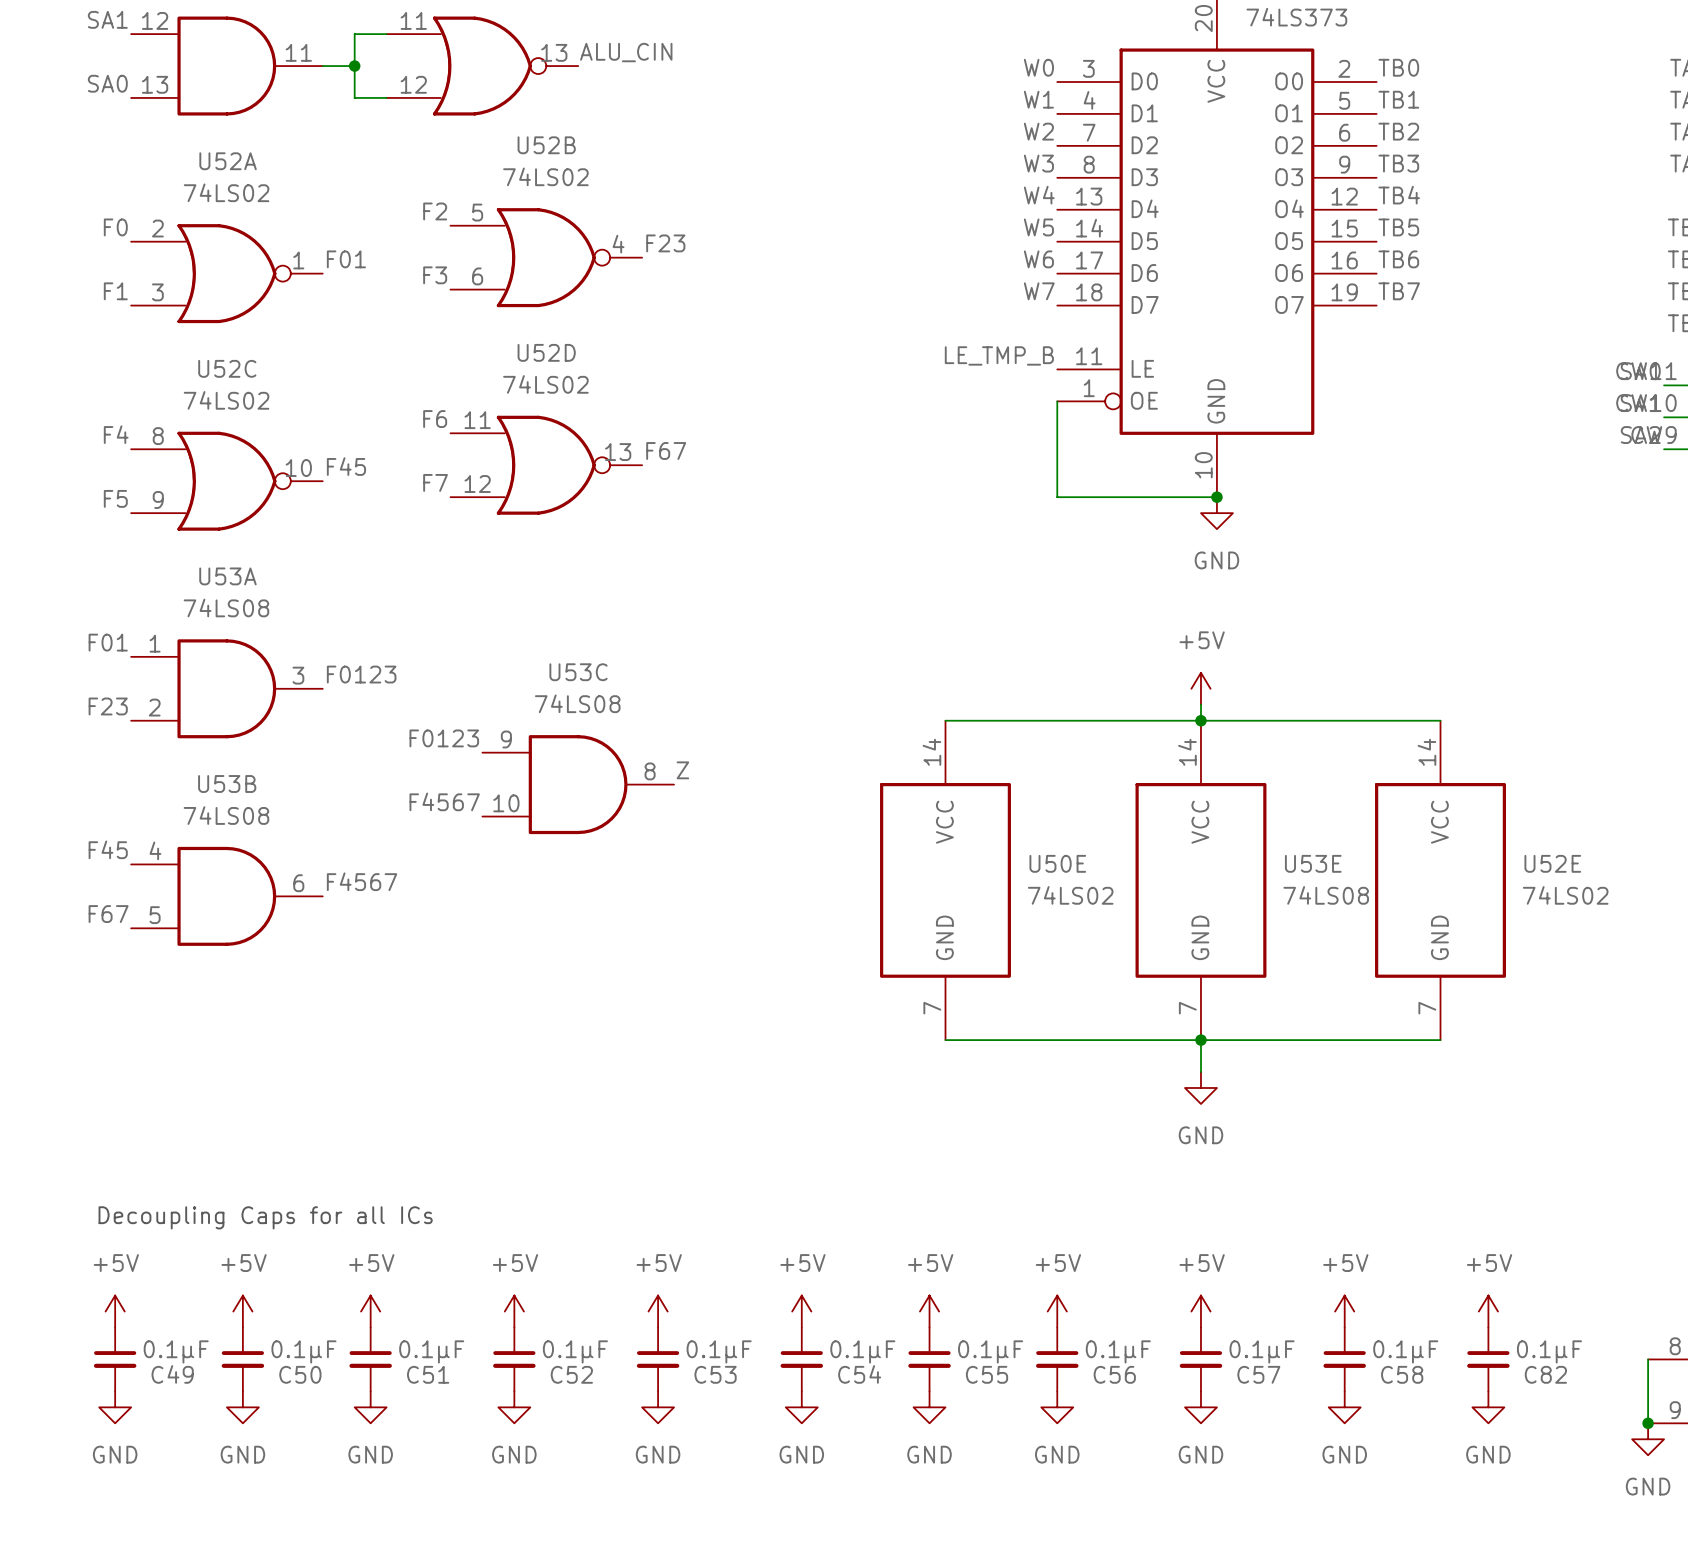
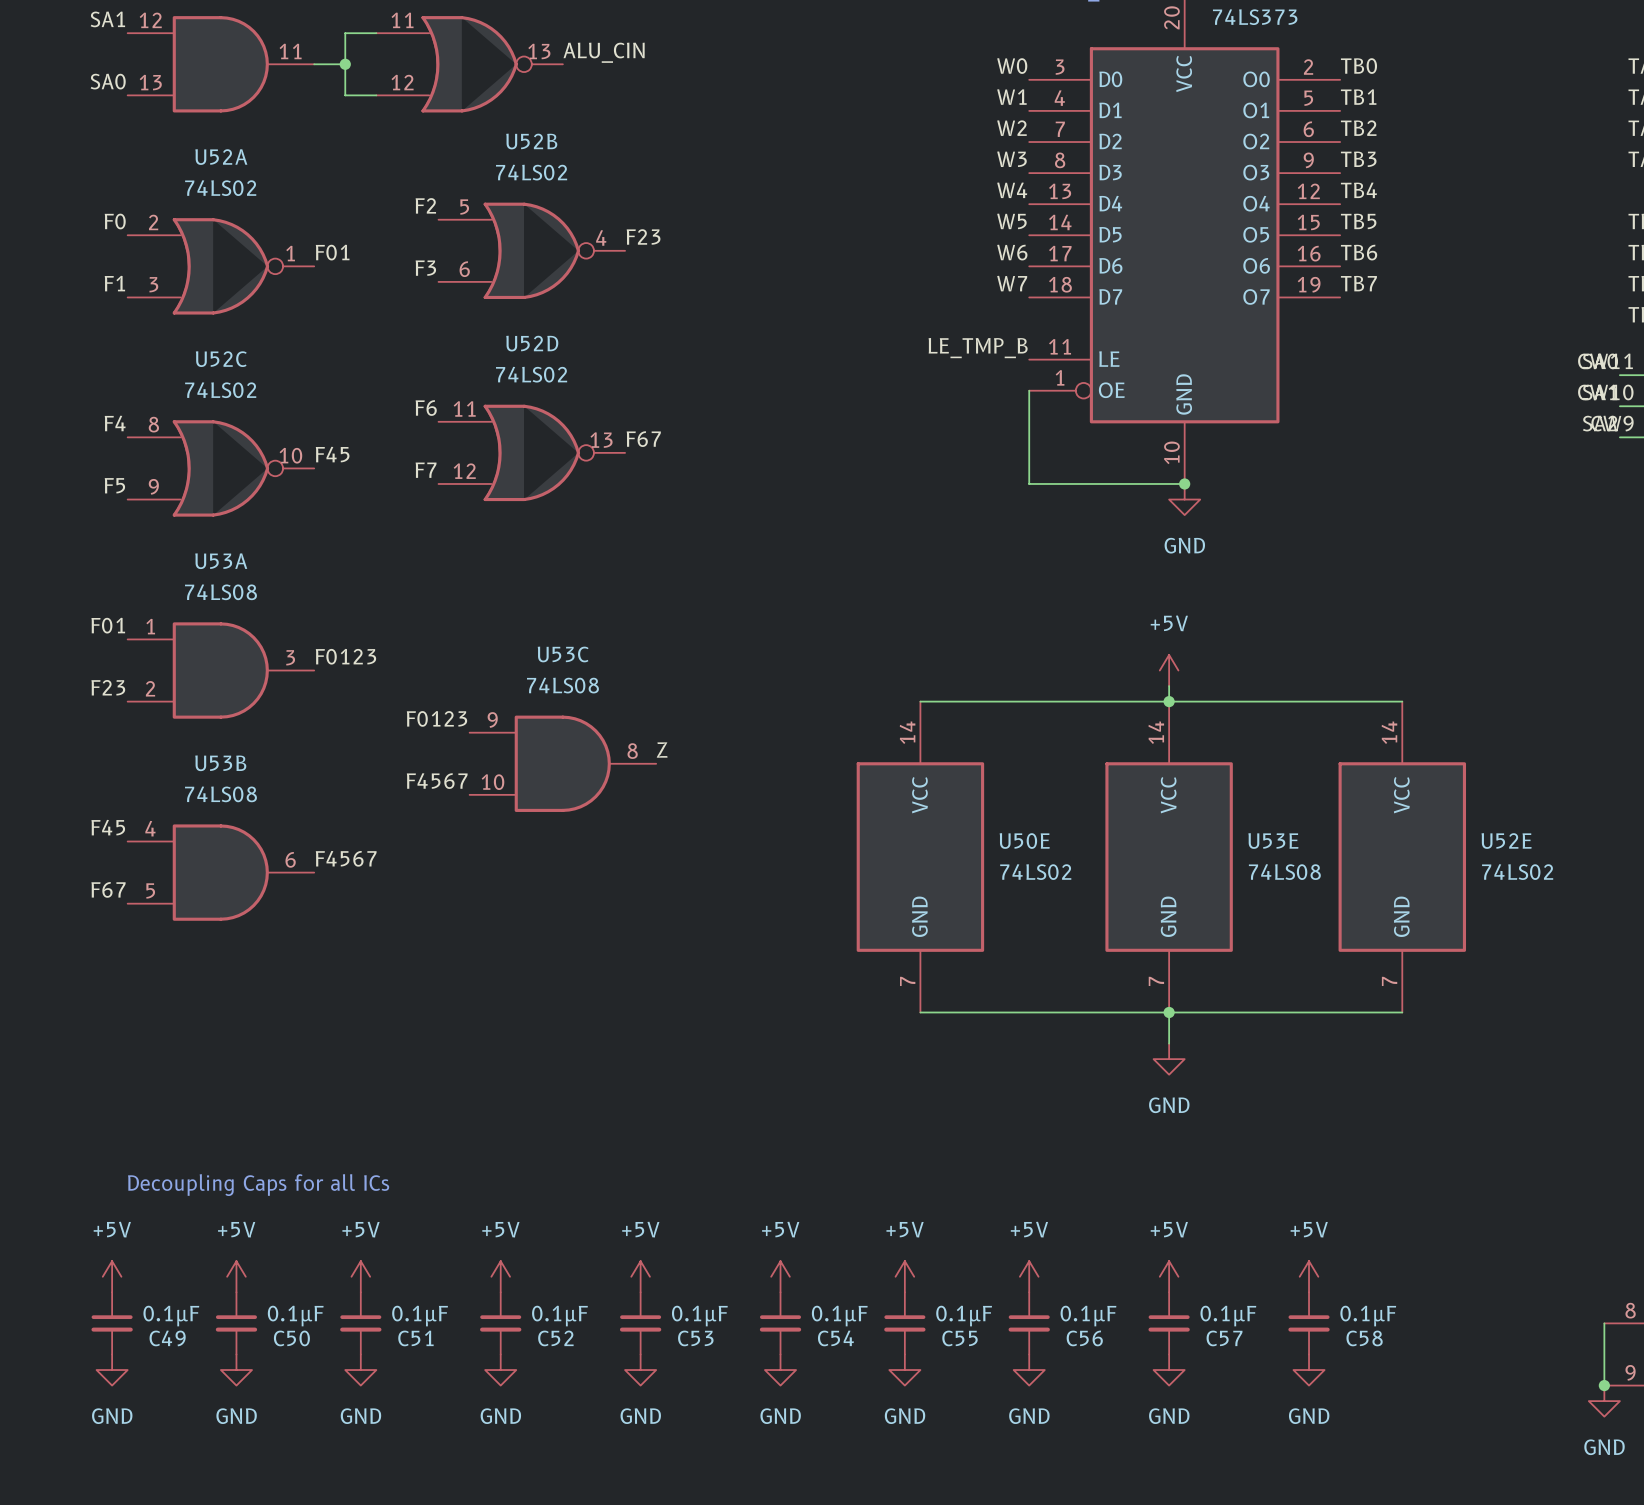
power symbol: +5V (1488, 1311) -> none
C82: 0.1µF (1488, 1359) -> none
power symbol: GND (1488, 1407) -> none

